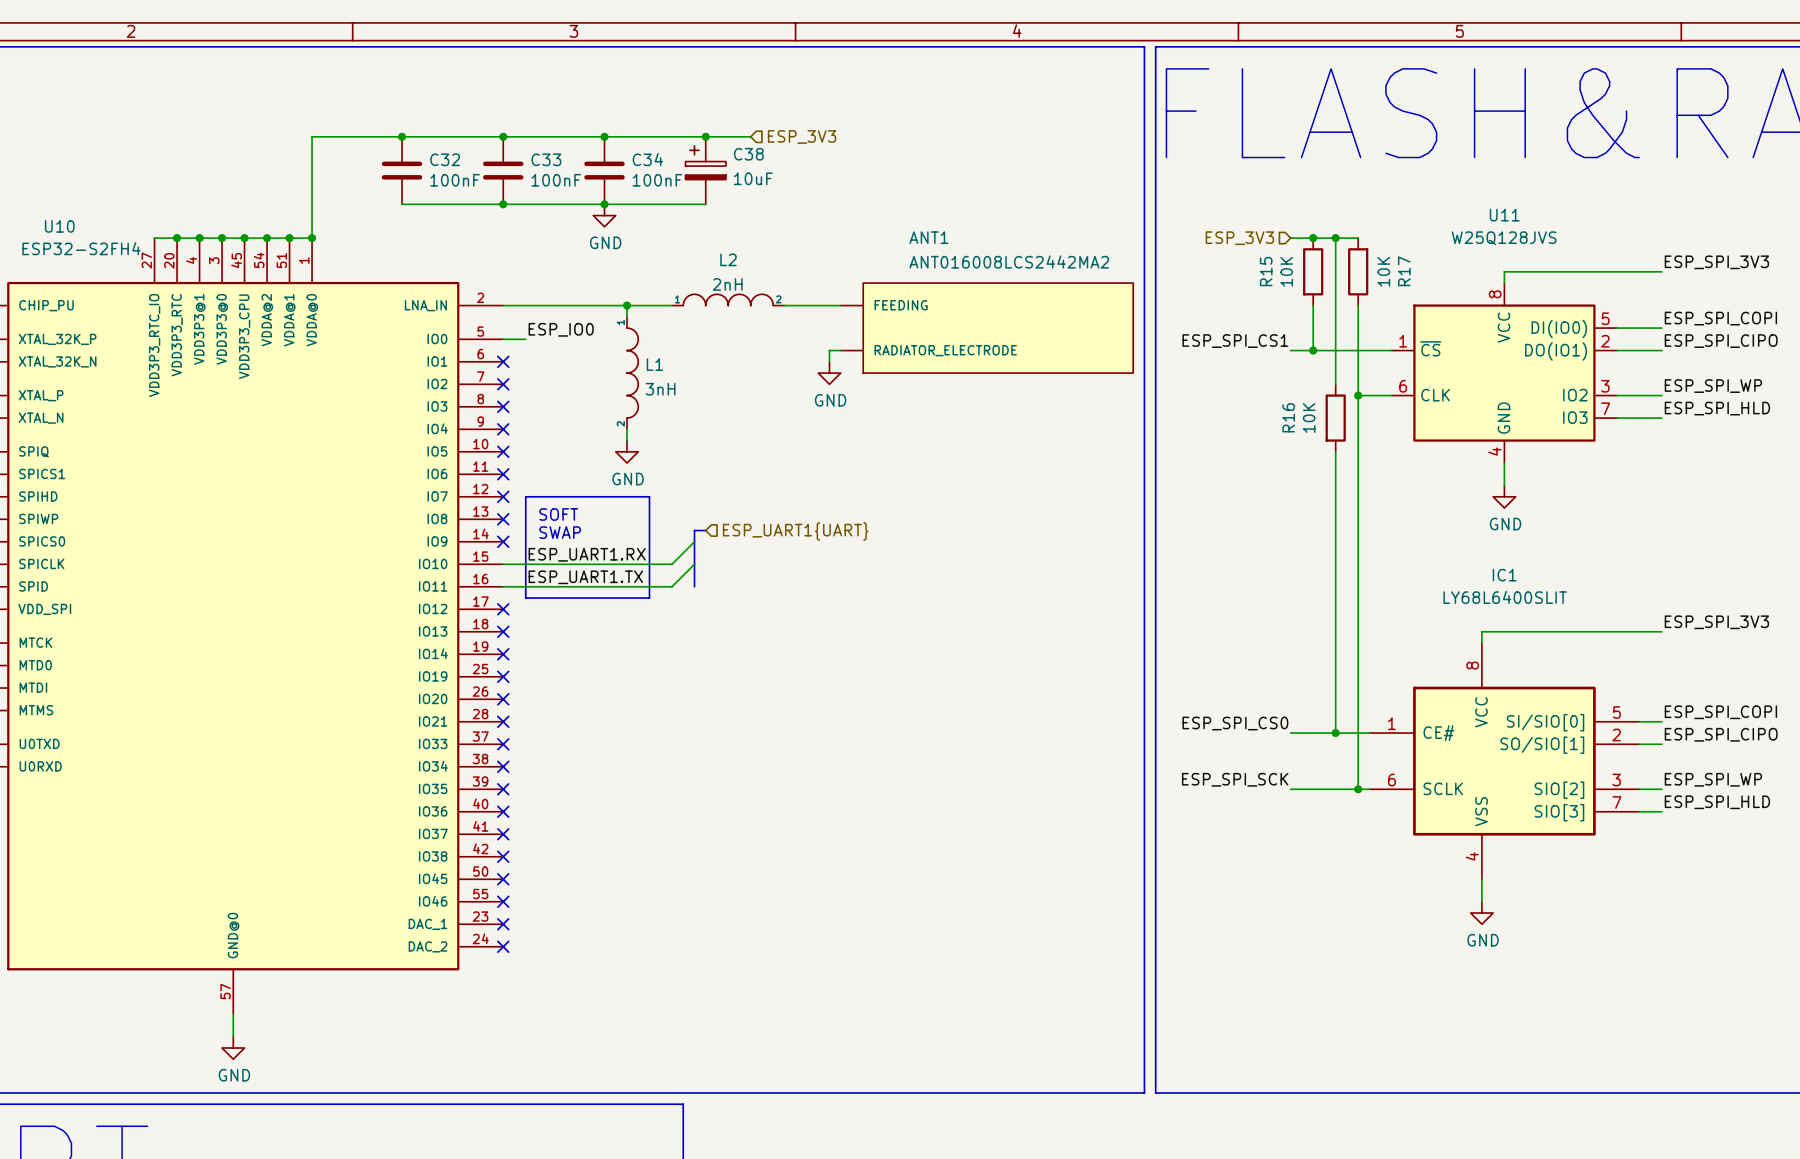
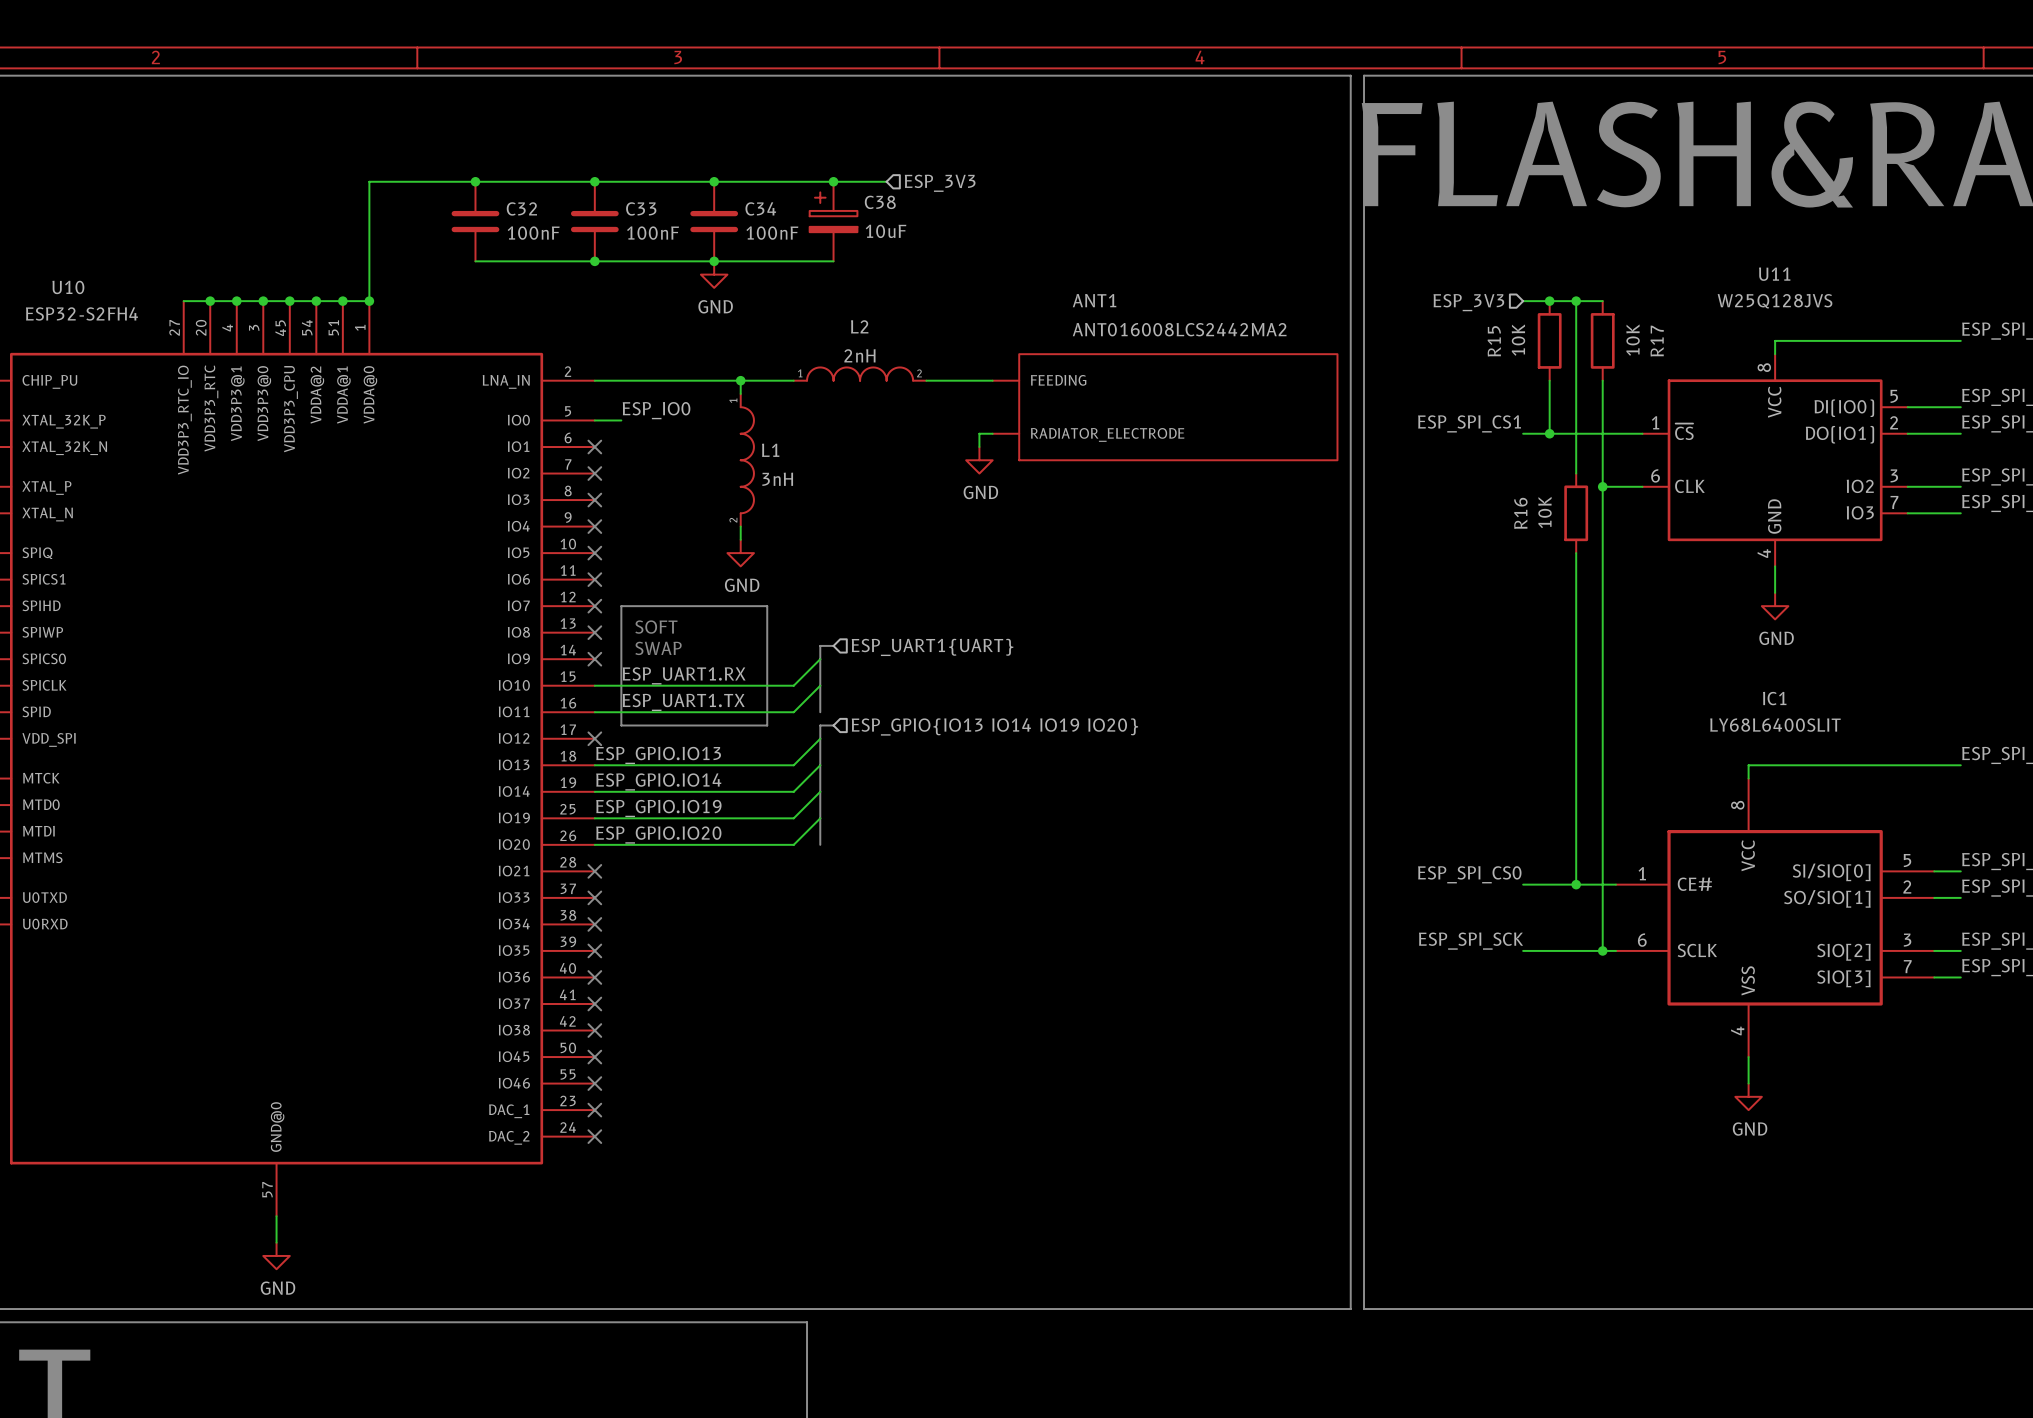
bus: none -> (833, 725) (820, 725) (820, 844)
hierarchical label: none -> ESP_GPIO{IO13 IO14 IO19 IO20} (994, 726)
wire: none -> (820, 738) (793, 765) (594, 765)
label: none -> ESP_GPIO.IO13 (658, 755)
no-connect mark: (503, 631) -> none
wire: none -> (820, 765) (793, 791) (594, 791)
label: none -> ESP_GPIO.IO14 (658, 781)
no-connect mark: (503, 654) -> none
wire: none -> (820, 791) (793, 818) (594, 818)
label: none -> ESP_GPIO.IO19 (658, 808)
no-connect mark: (503, 676) -> none
wire: none -> (820, 818) (793, 844) (594, 844)
label: none -> ESP_GPIO.IO20 (658, 835)
no-connect mark: (503, 699) -> none

